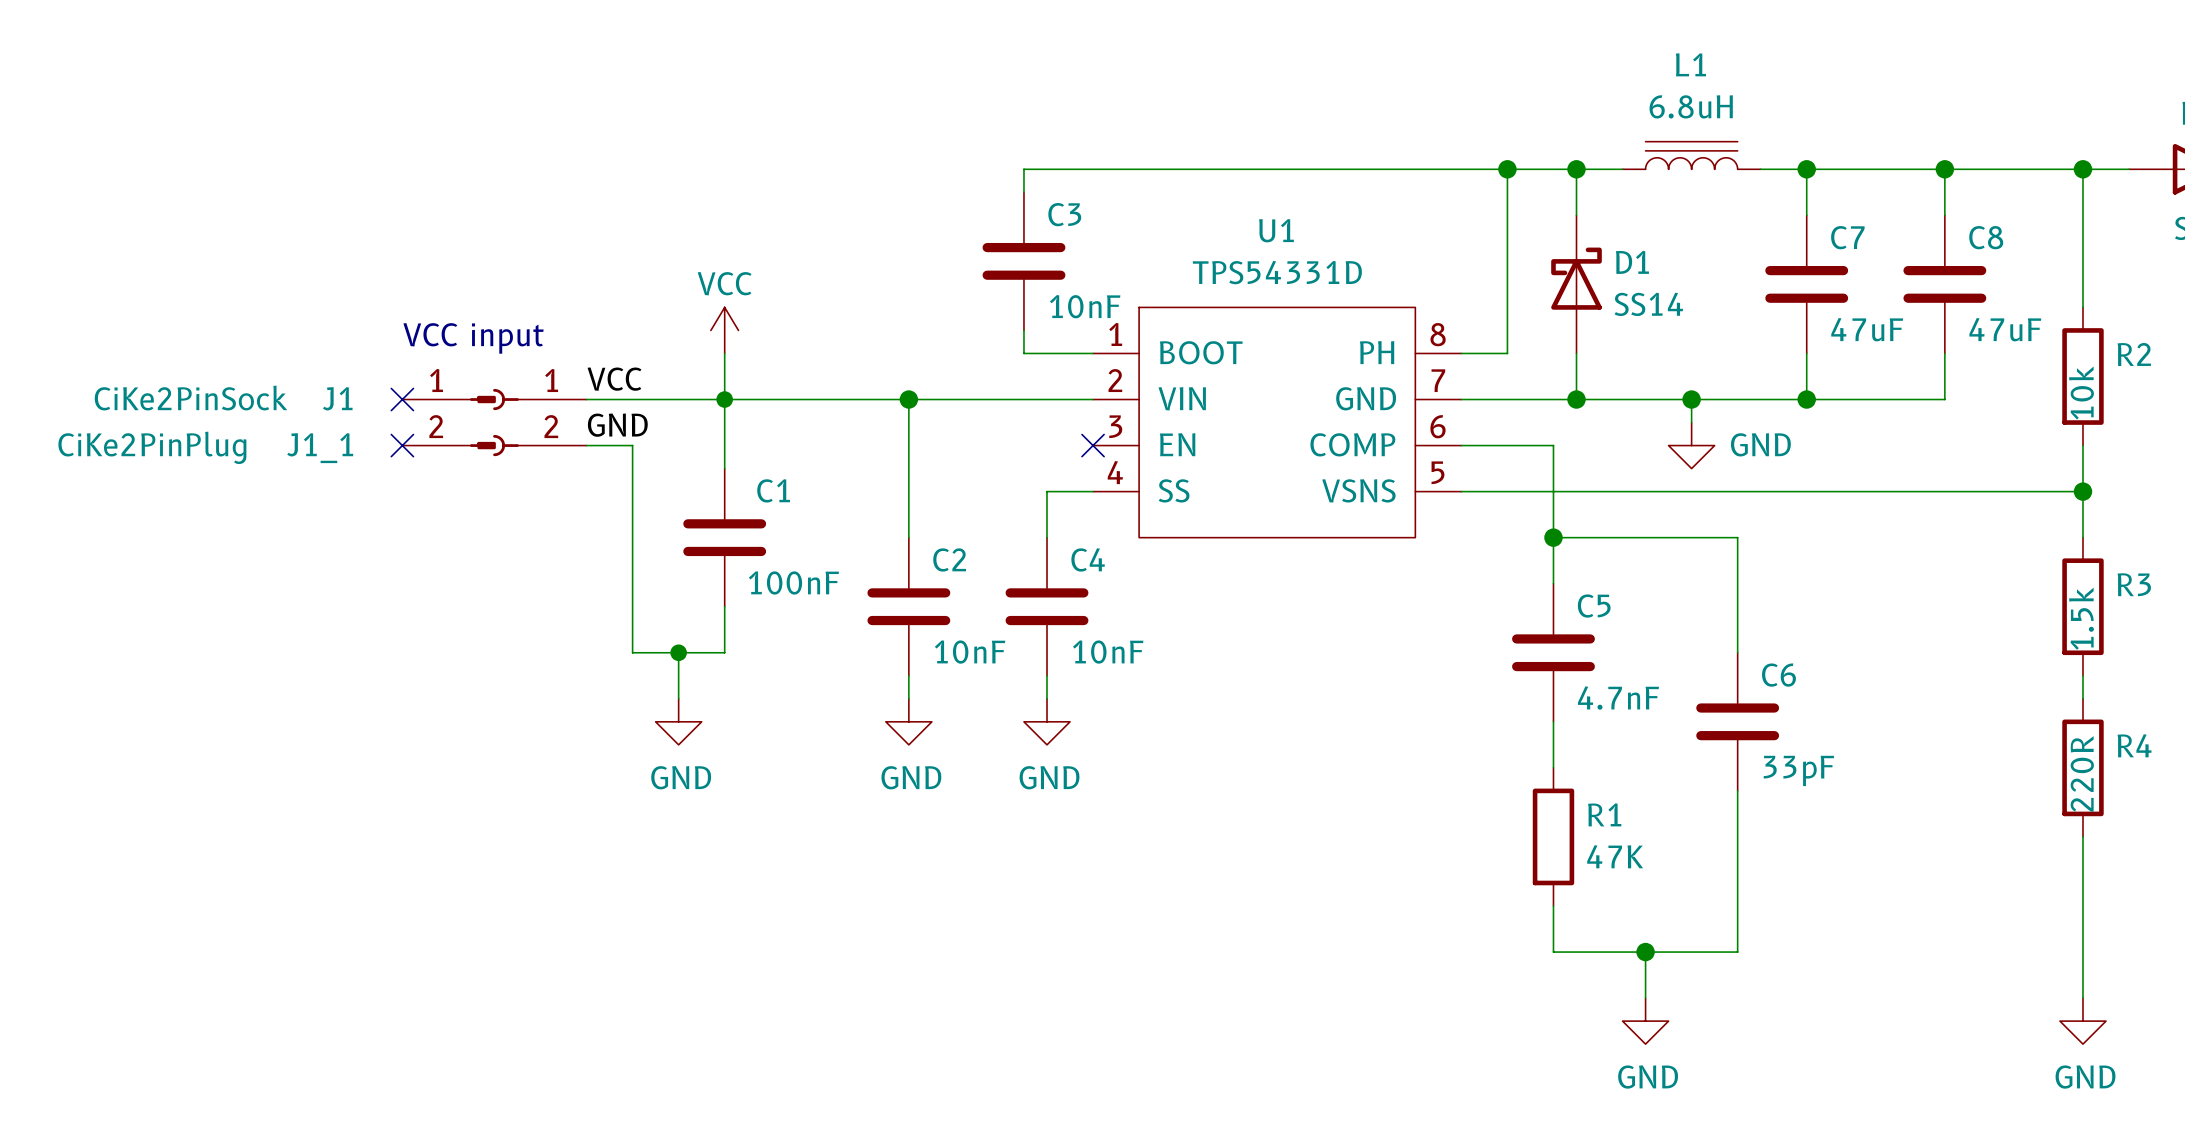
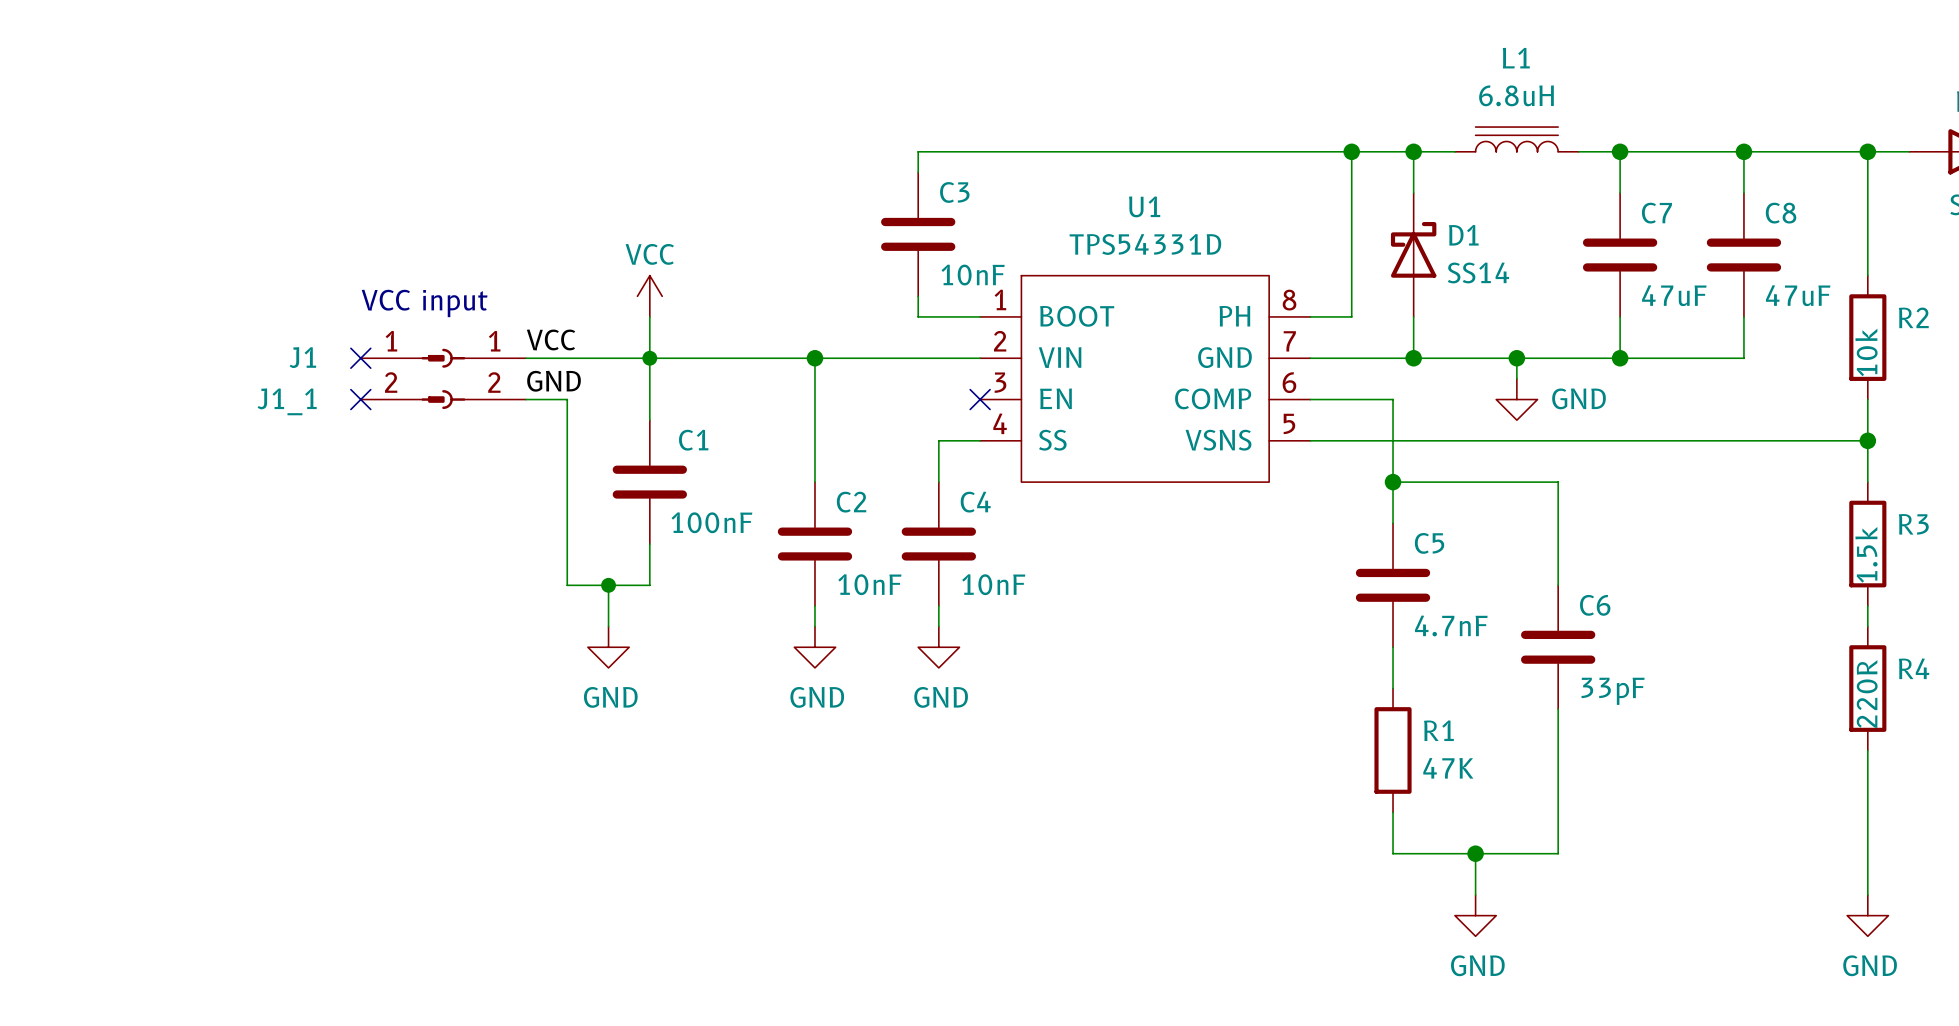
J1 value: CiKe2PinSock (191, 398) -> none
J1_1 value: CiKe2PinPlug (152, 447) -> none

